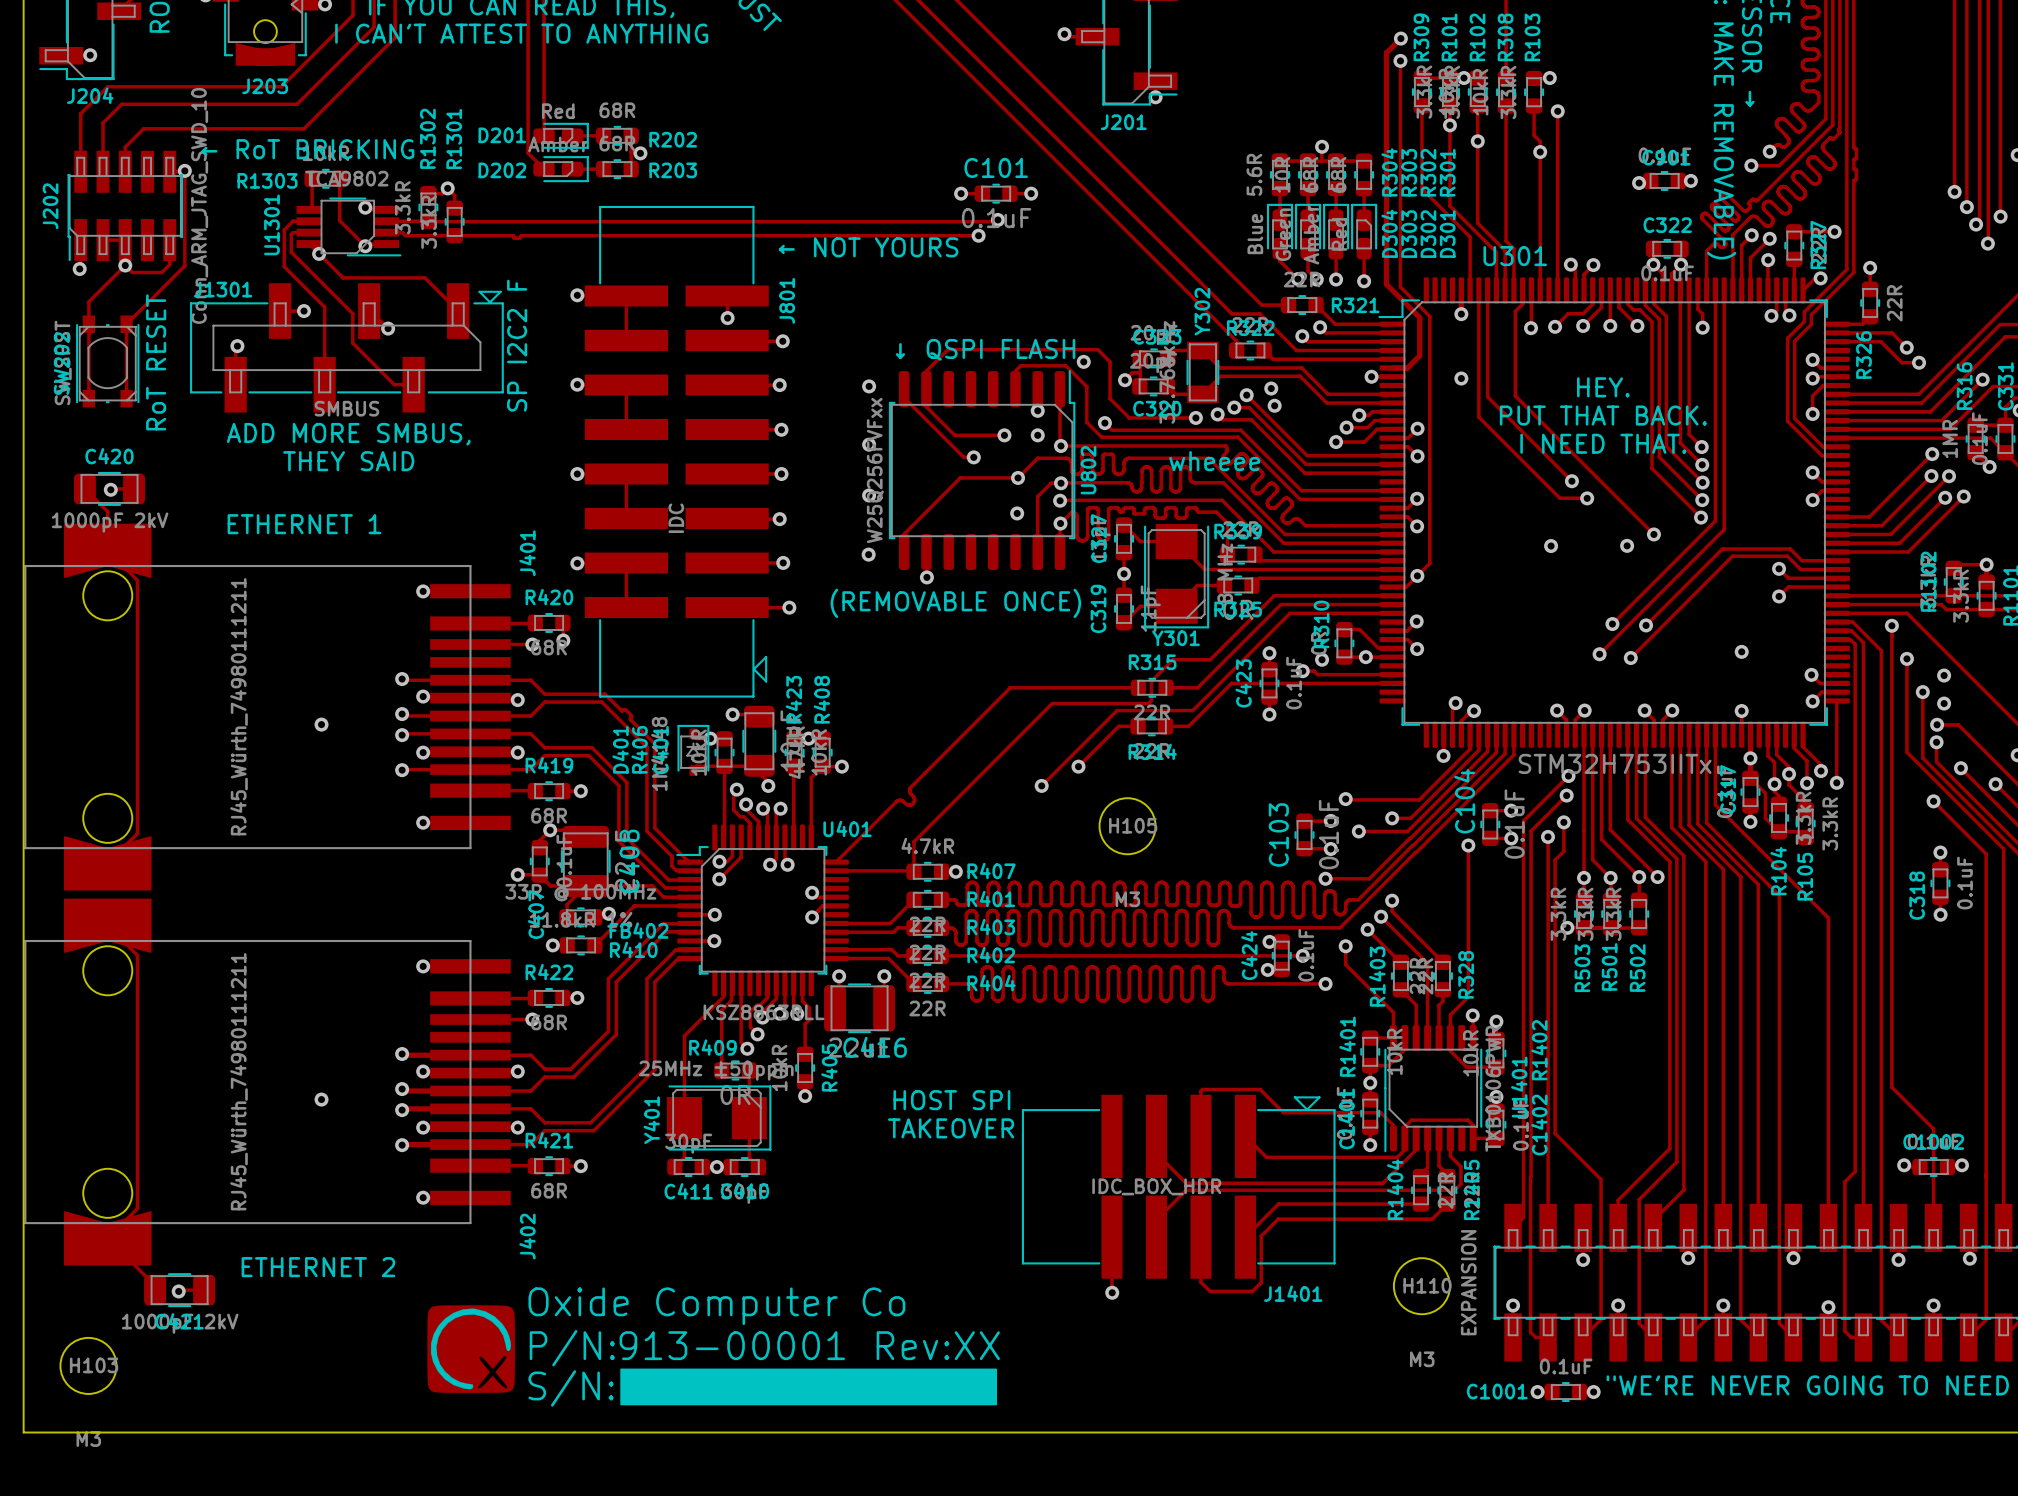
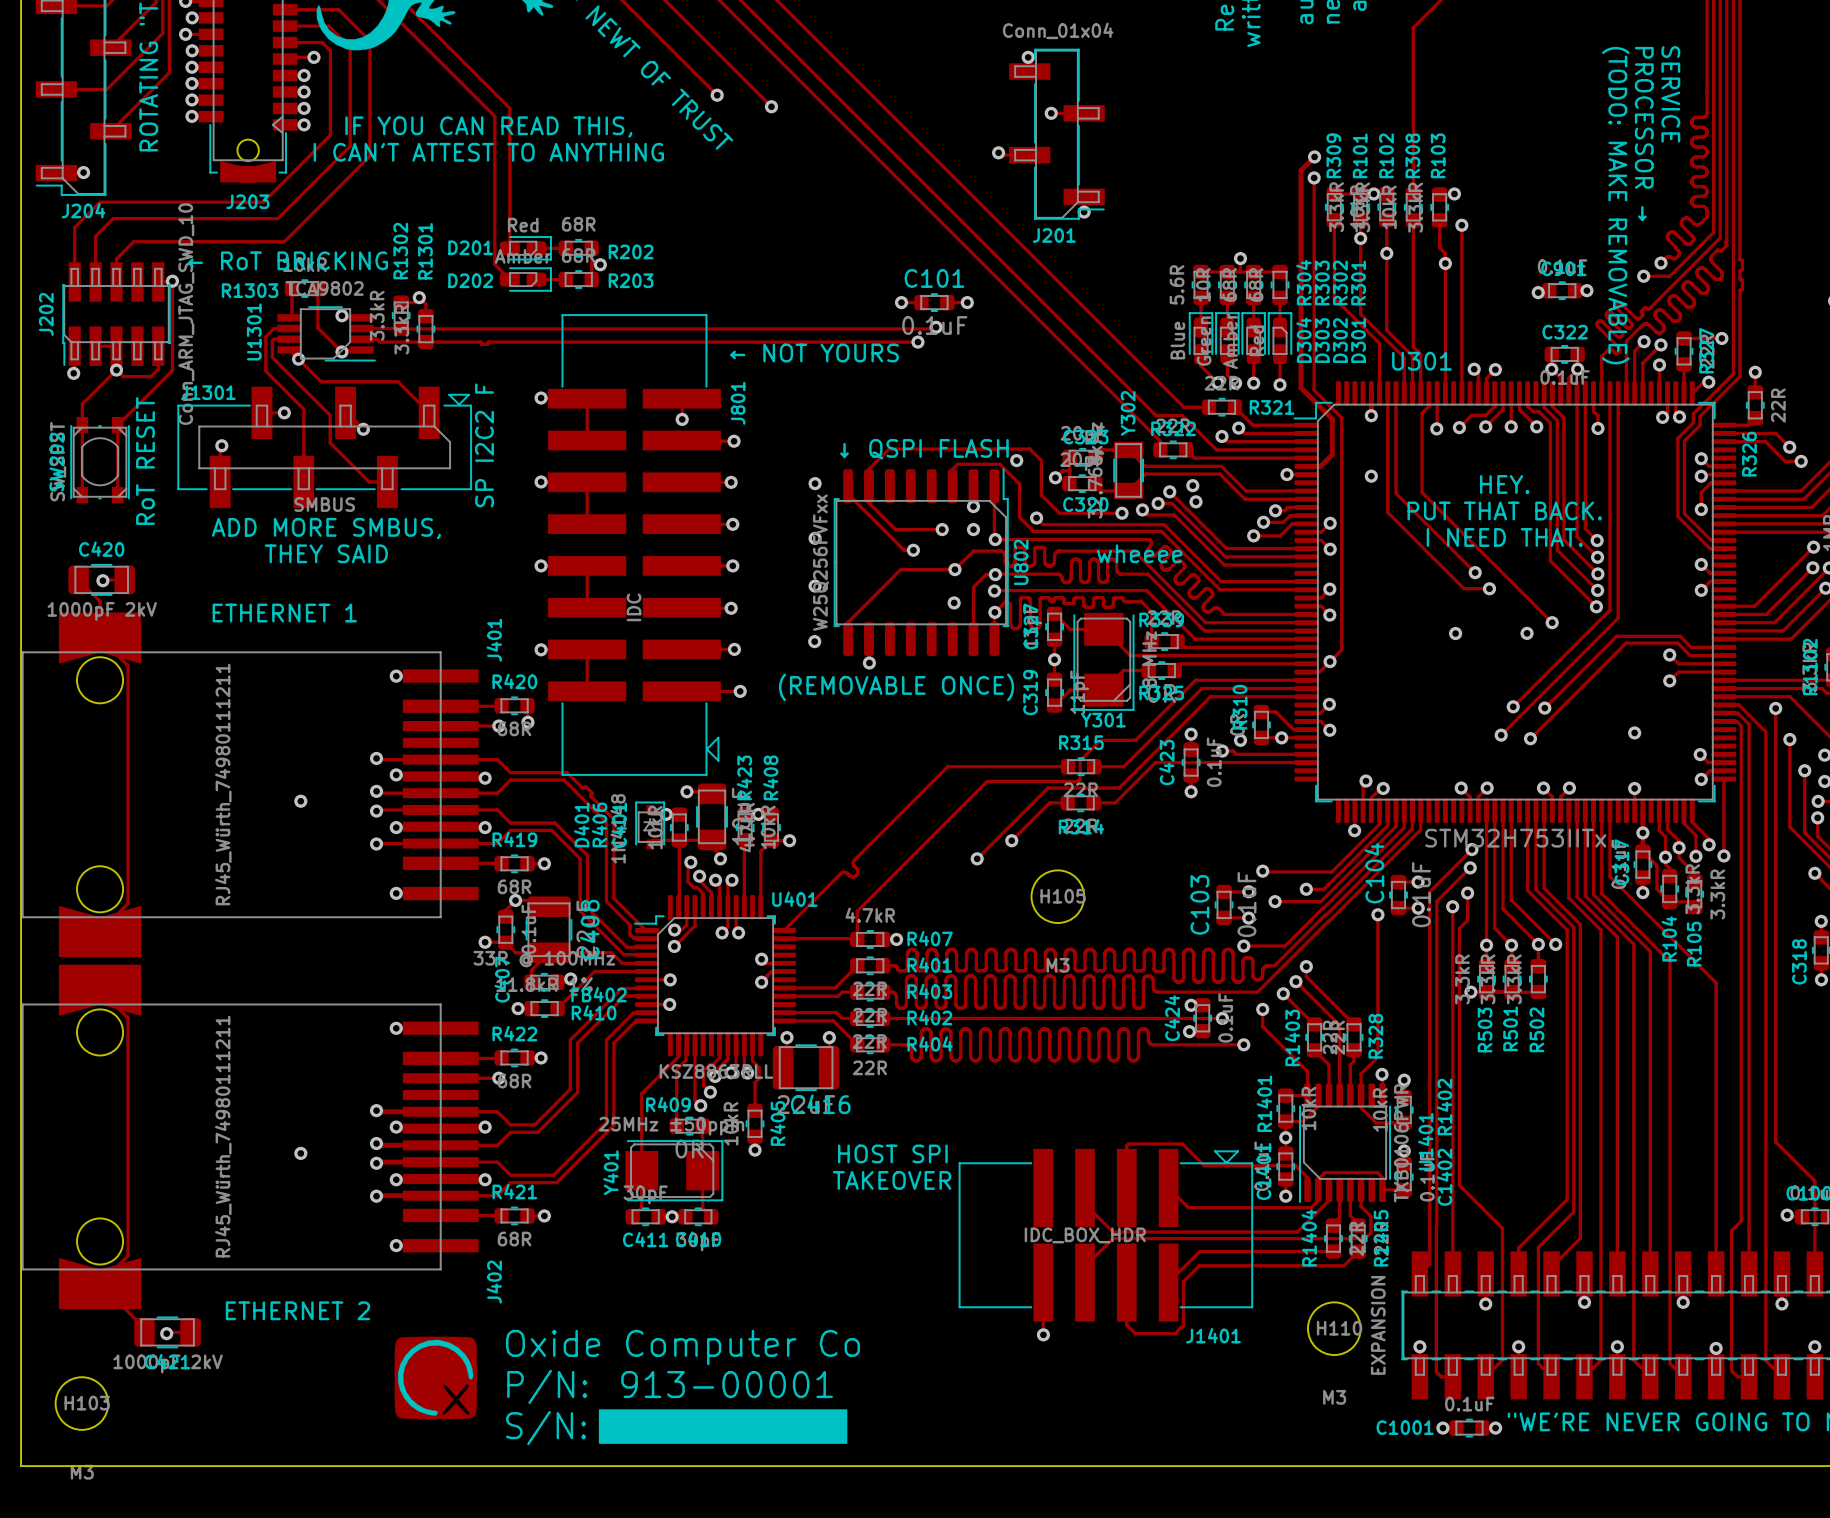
drawing: none -> [394, 1336, 848, 1444]
drawing: [427, 1305, 998, 1406] -> none

